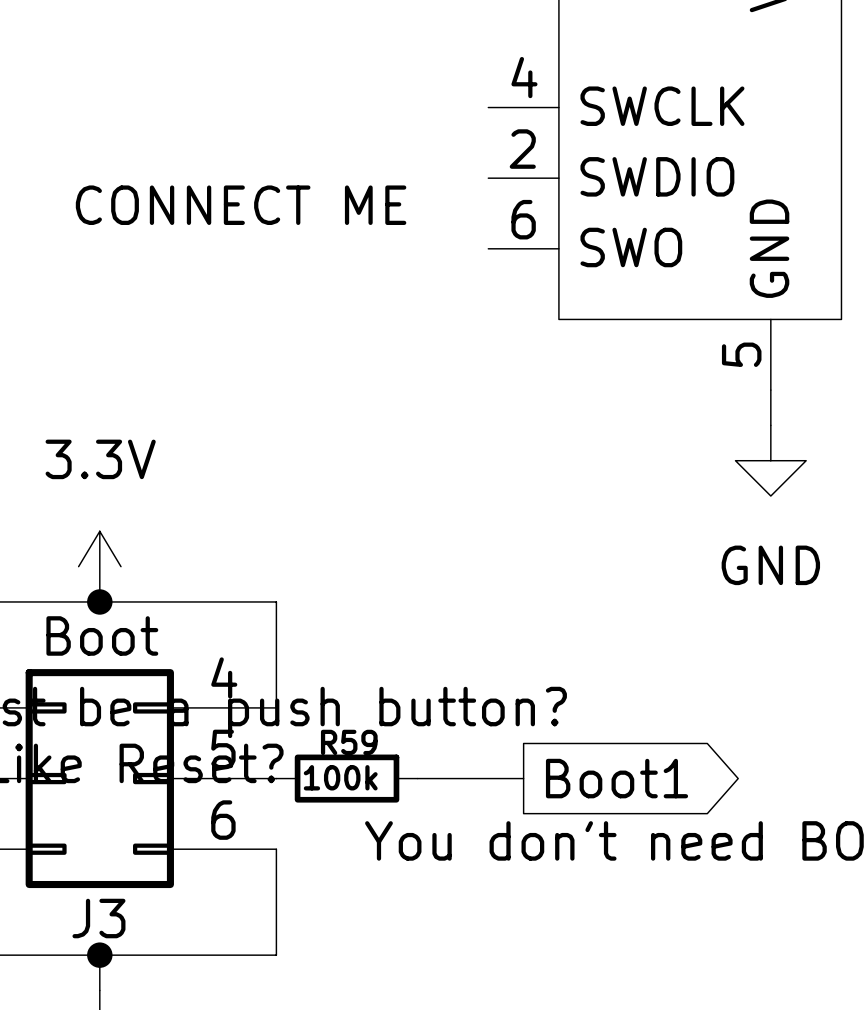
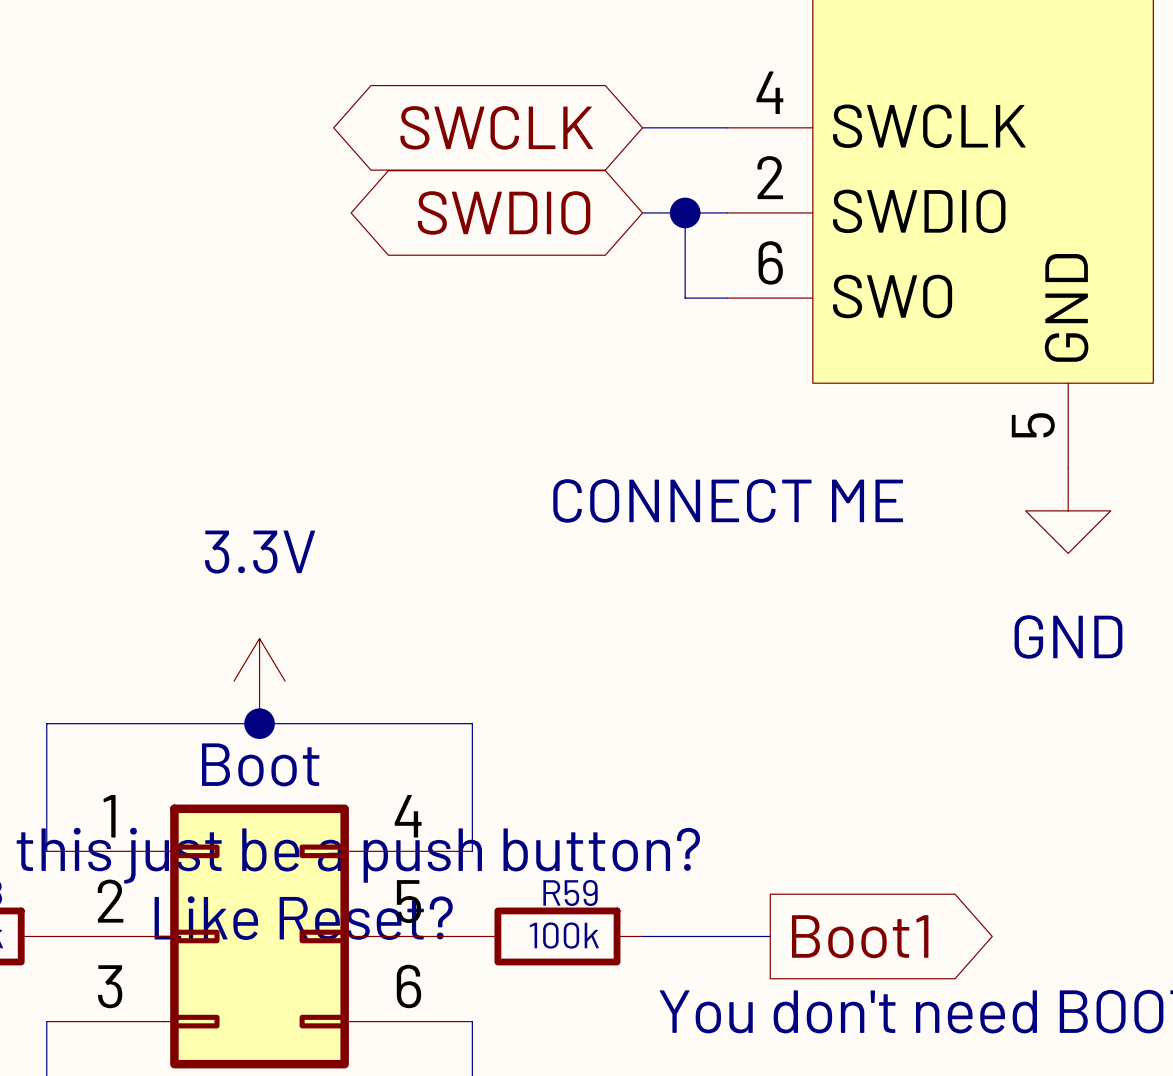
global label: none -> SWCLK (496, 127)
wire: none -> (642, 127) (727, 127)
global label: none -> SWDIO (504, 212)
wire: none -> (642, 212) (727, 212)
wire: none -> (685, 212) (685, 298) (727, 298)
junction: none -> (685, 212)
text position: CONNECT ME (241, 205) -> CONNECT ME (728, 500)
power symbol position: GND (770, 460) -> GND (1068, 510)

